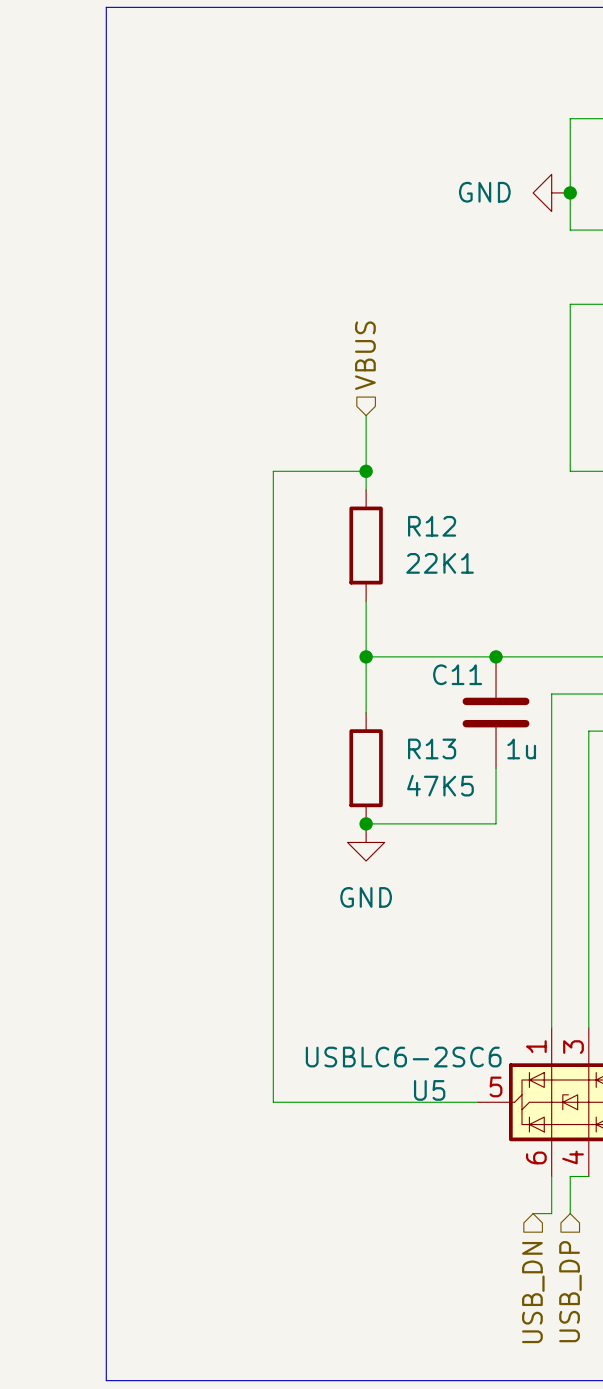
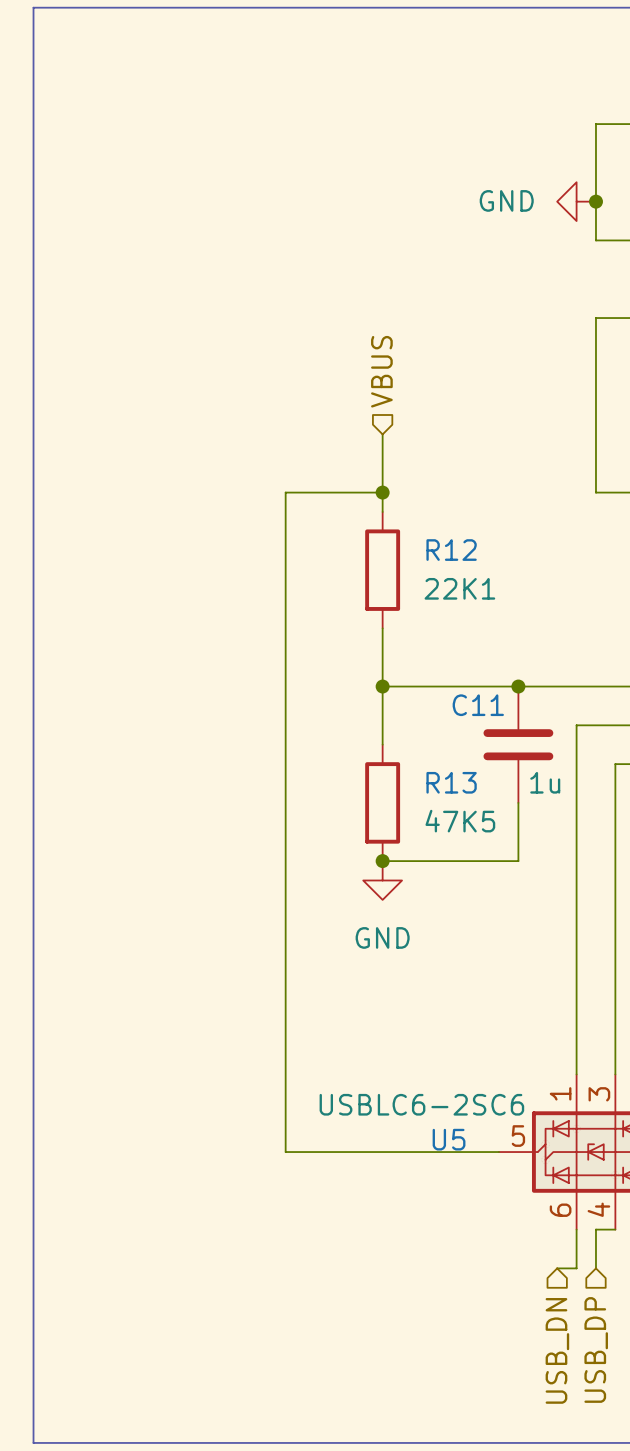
line: (106, 7) (106, 1380) -> (111, 7) (33, 7) (33, 1442) (111, 1442)

